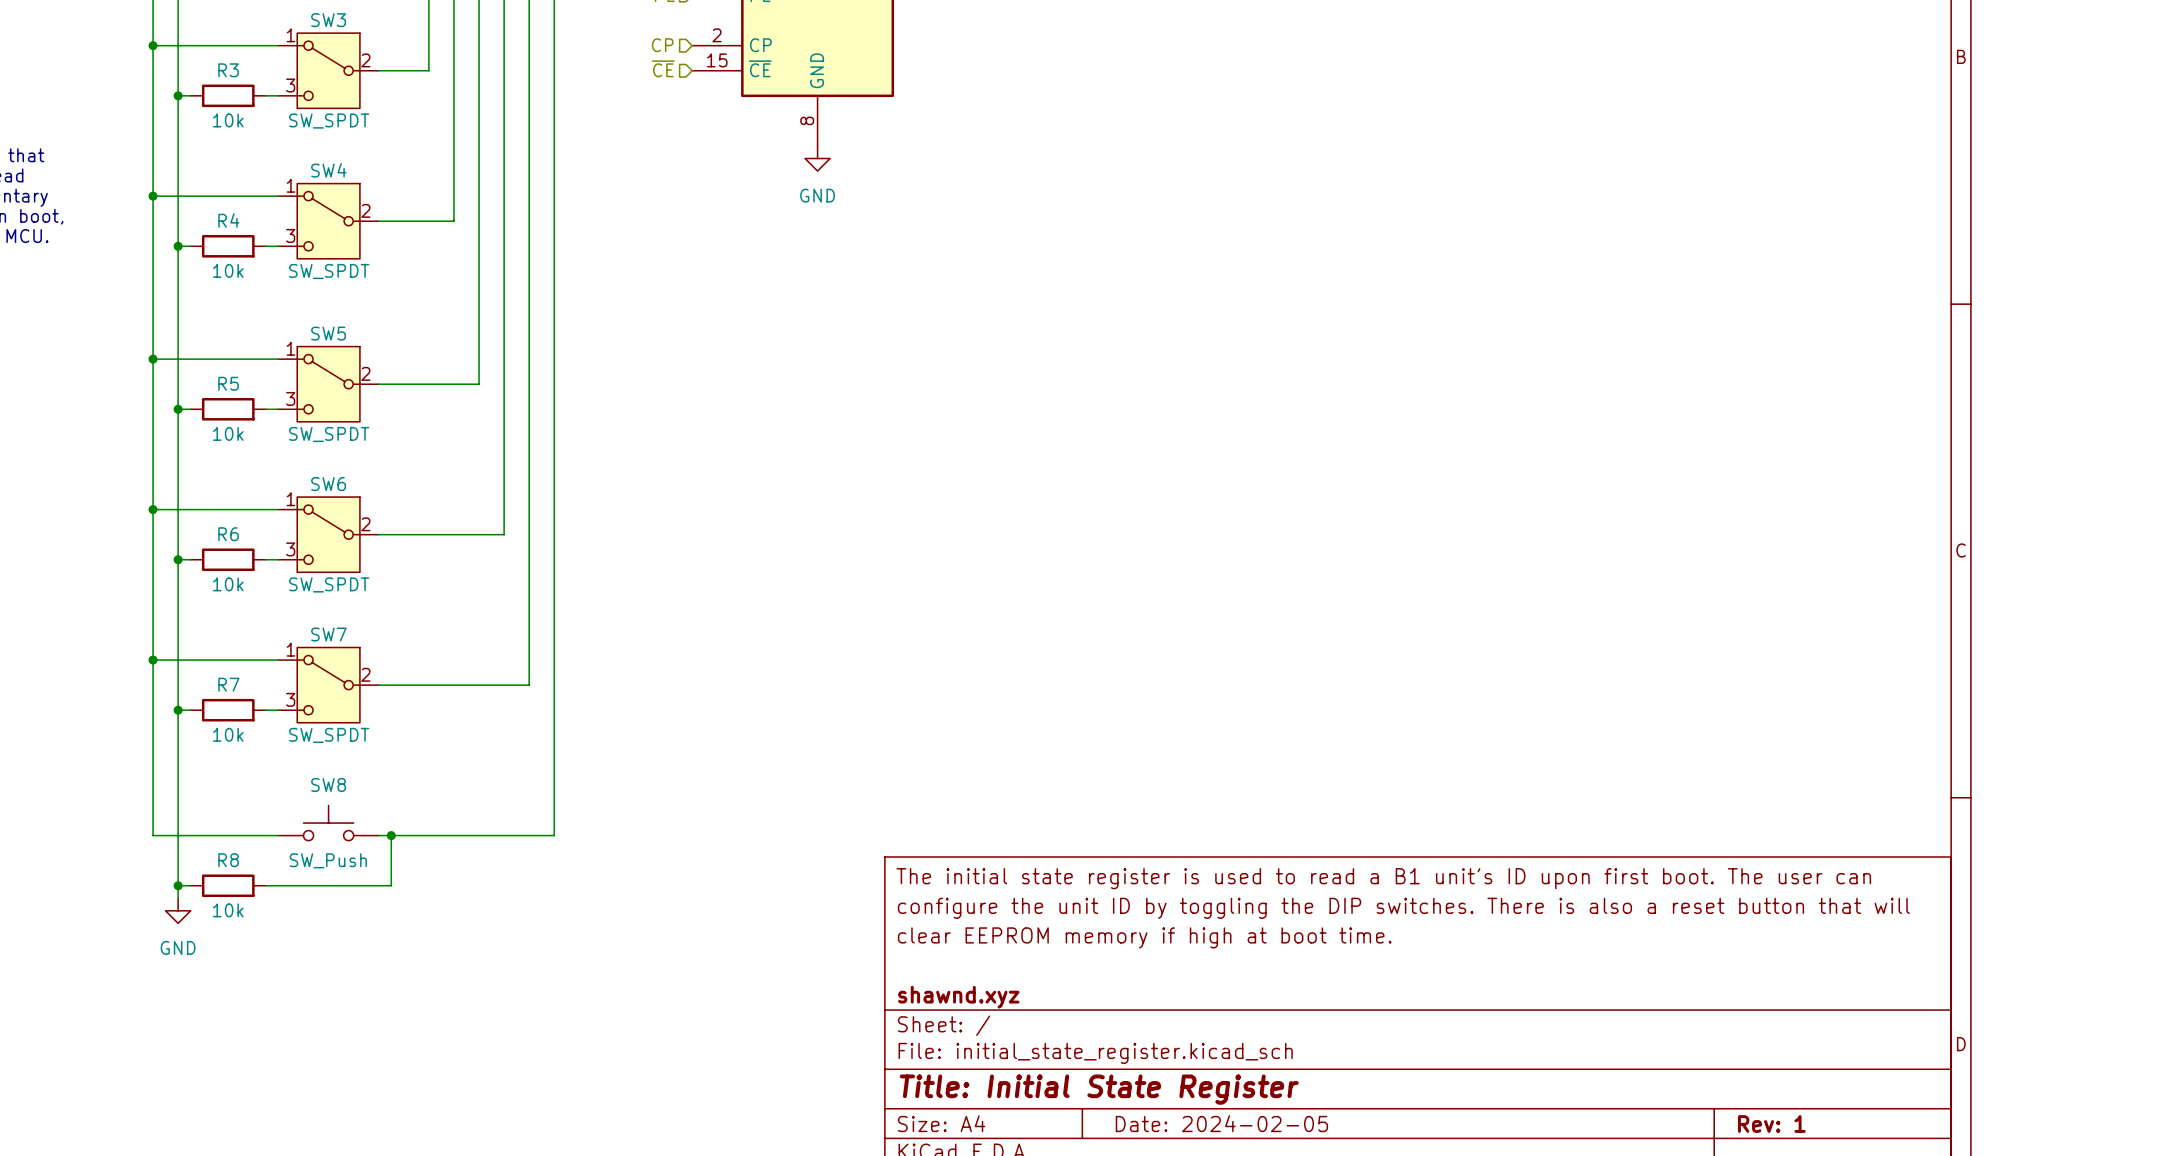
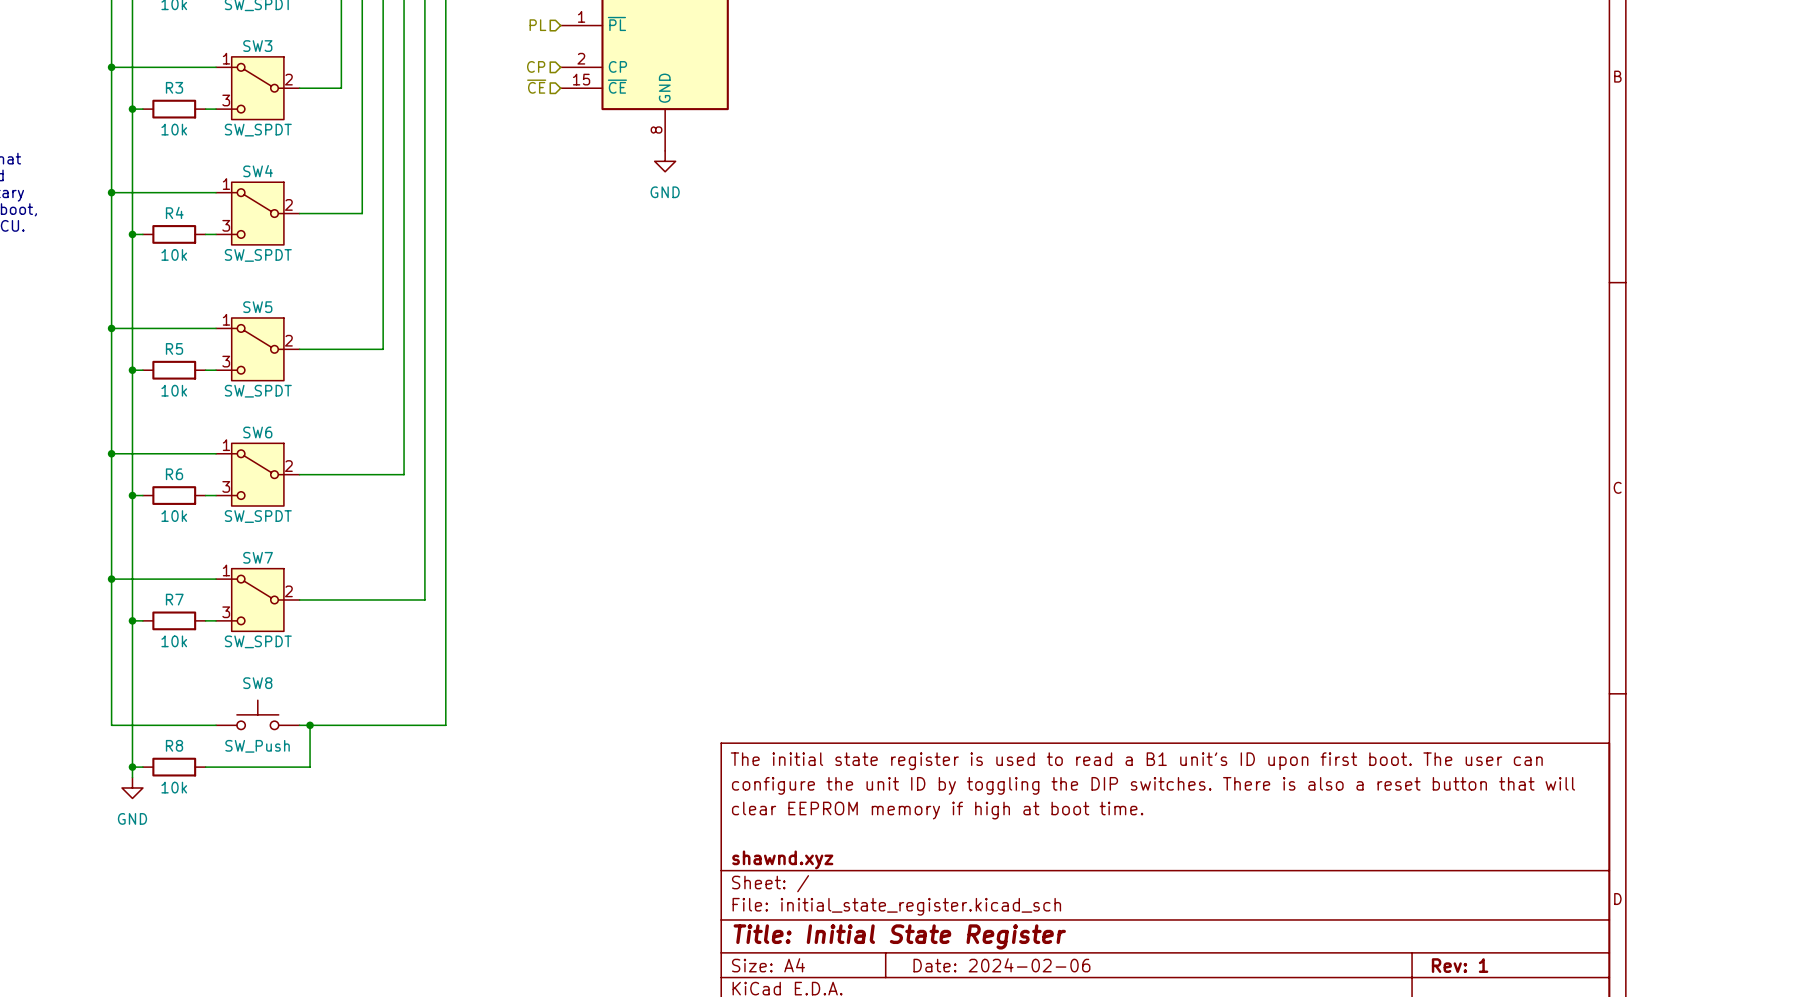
title block: Date: 2024-02-05 (1221, 1123) -> Date: 2024-02-06 (1001, 965)

